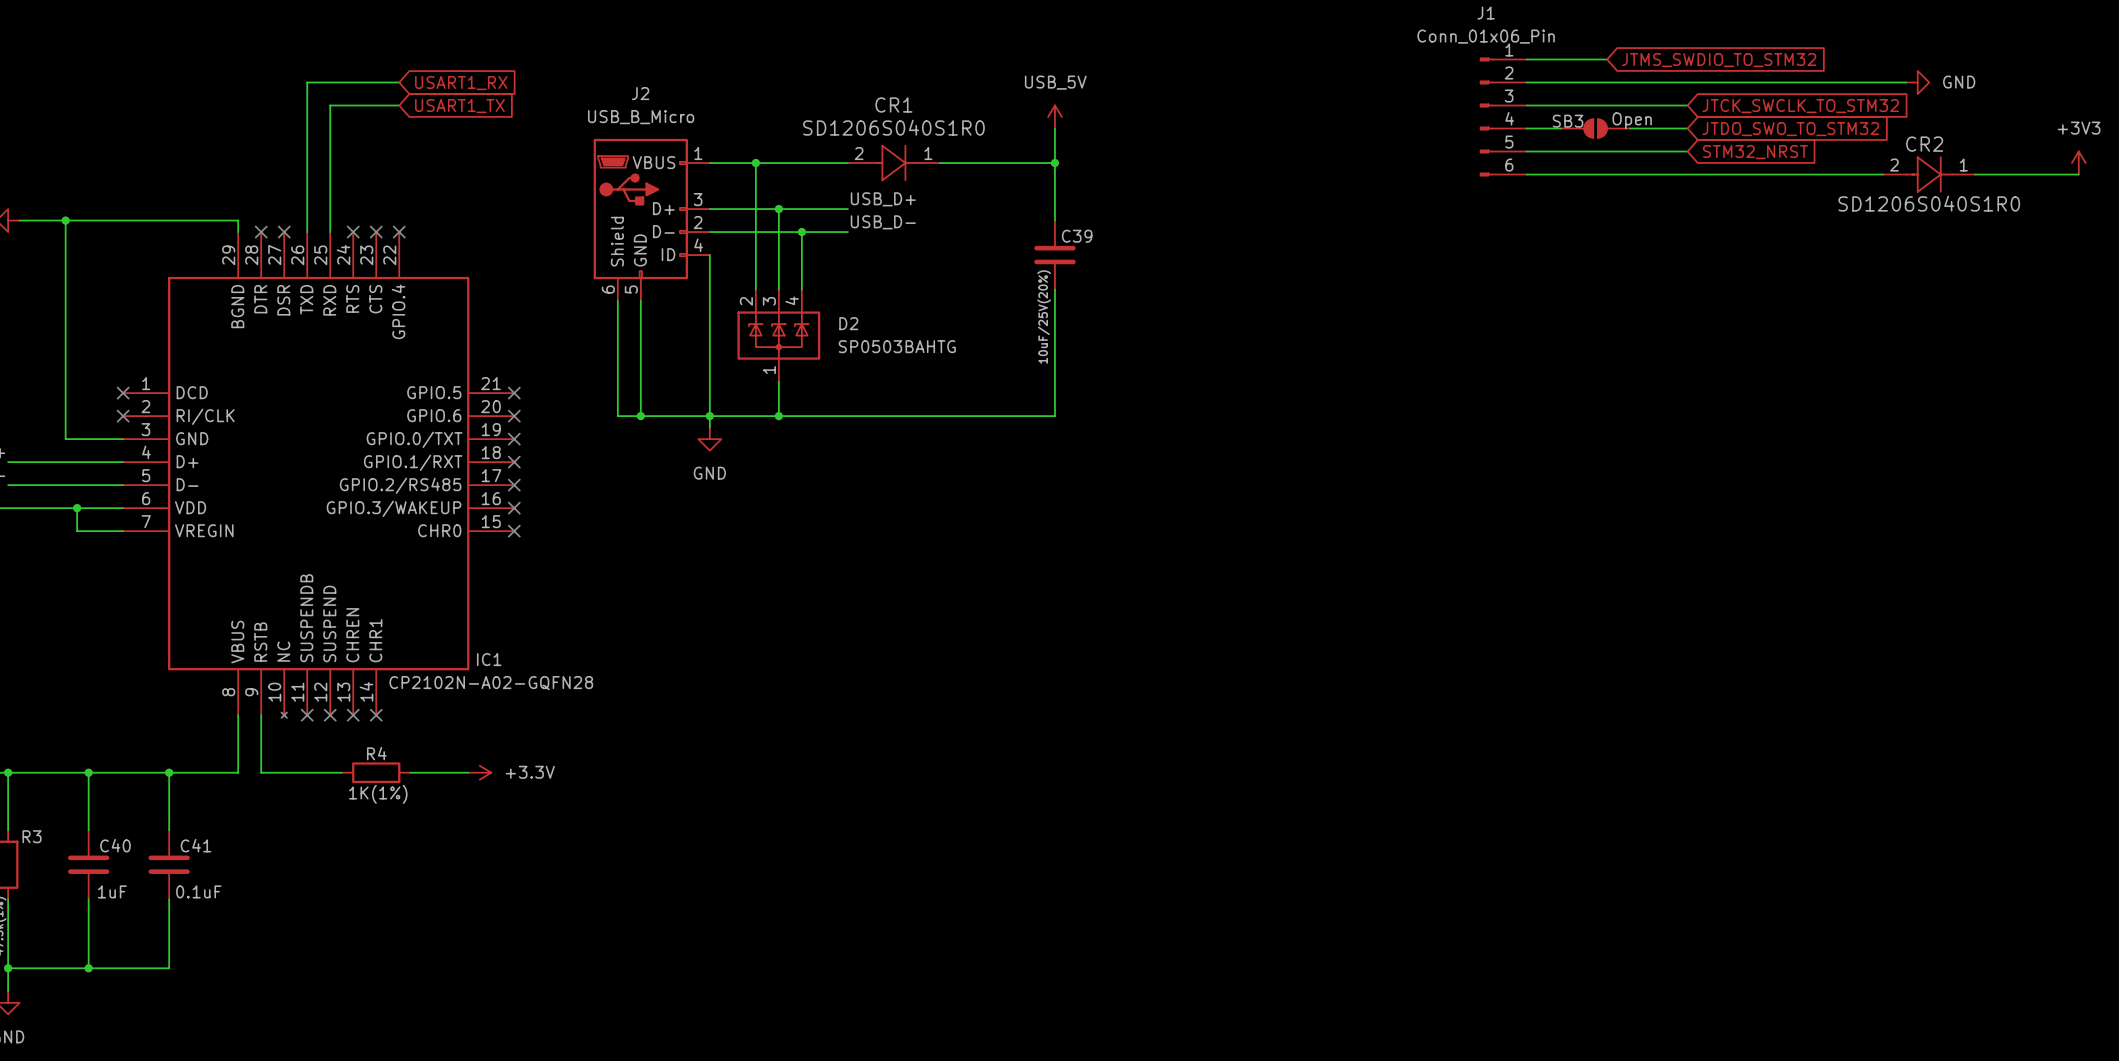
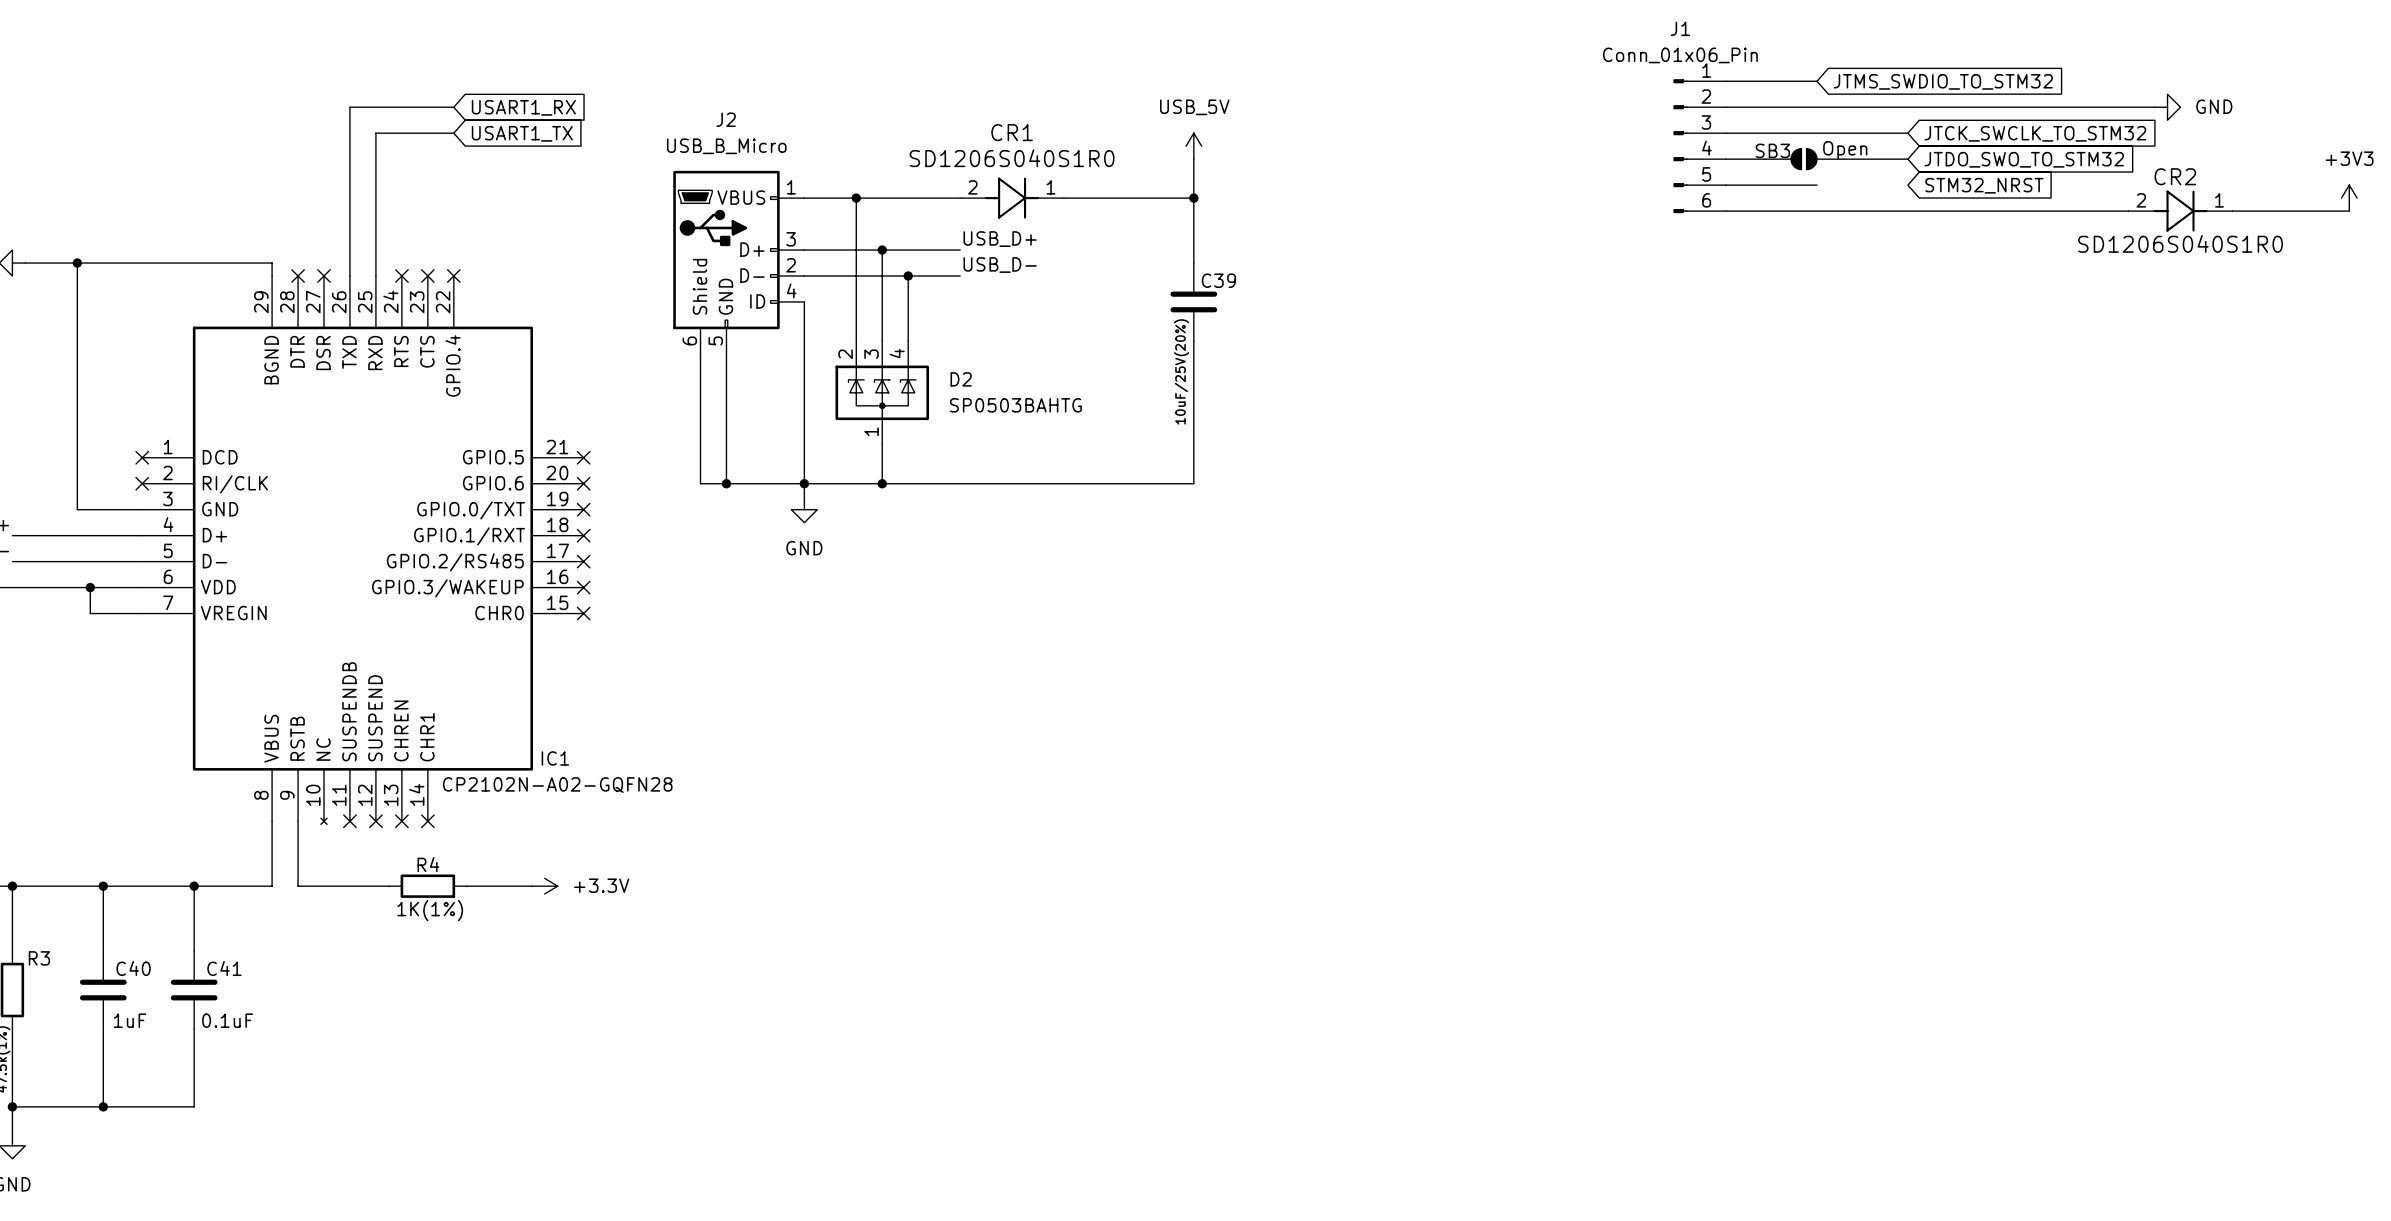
wire: (1607, 151) (1687, 151) -> none

